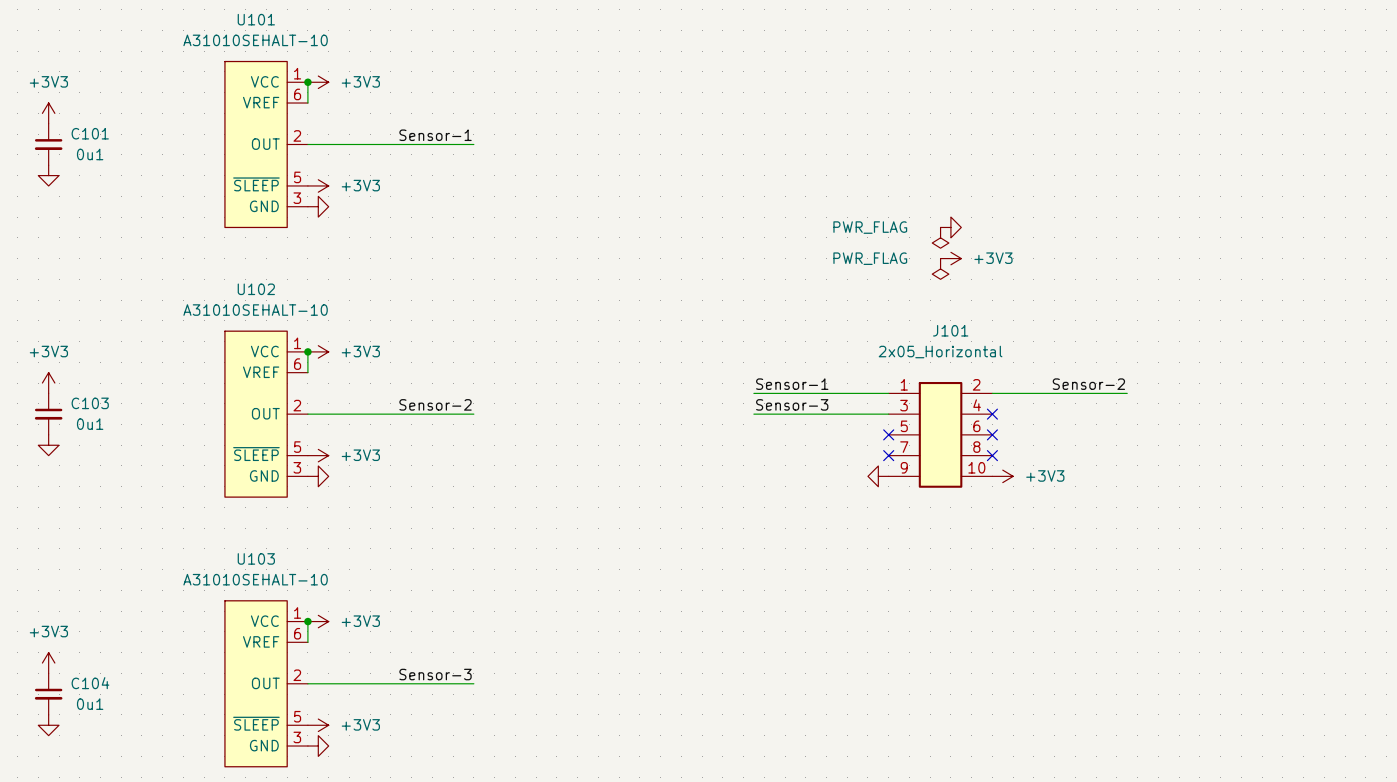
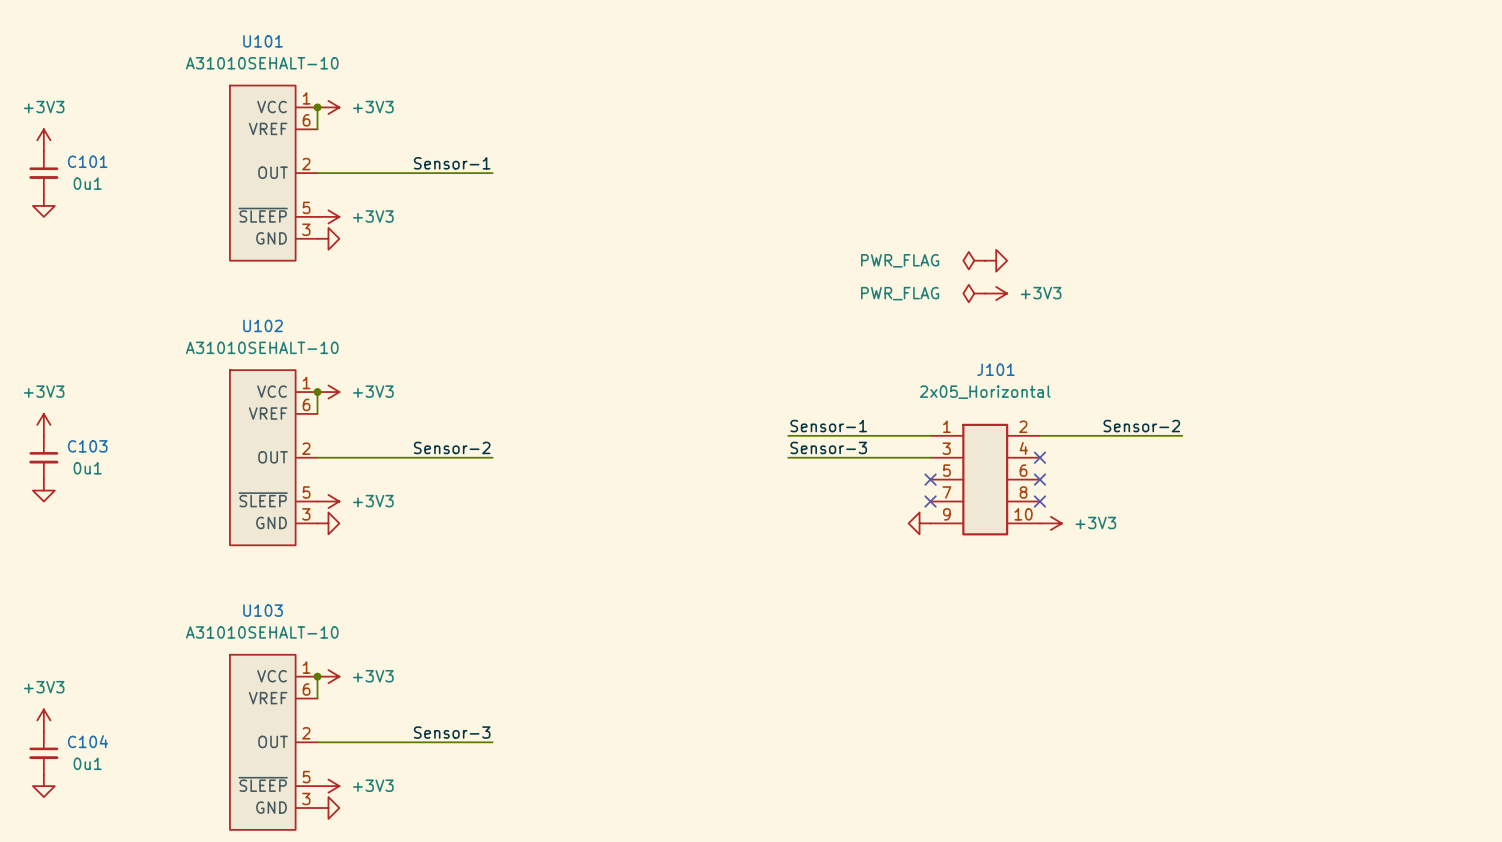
power symbol: none -> PWR_FLAG (974, 260)
power symbol: PWR_FLAG (940, 237) -> none
power symbol: none -> PWR_FLAG (974, 293)
power symbol: PWR_FLAG (940, 268) -> none

